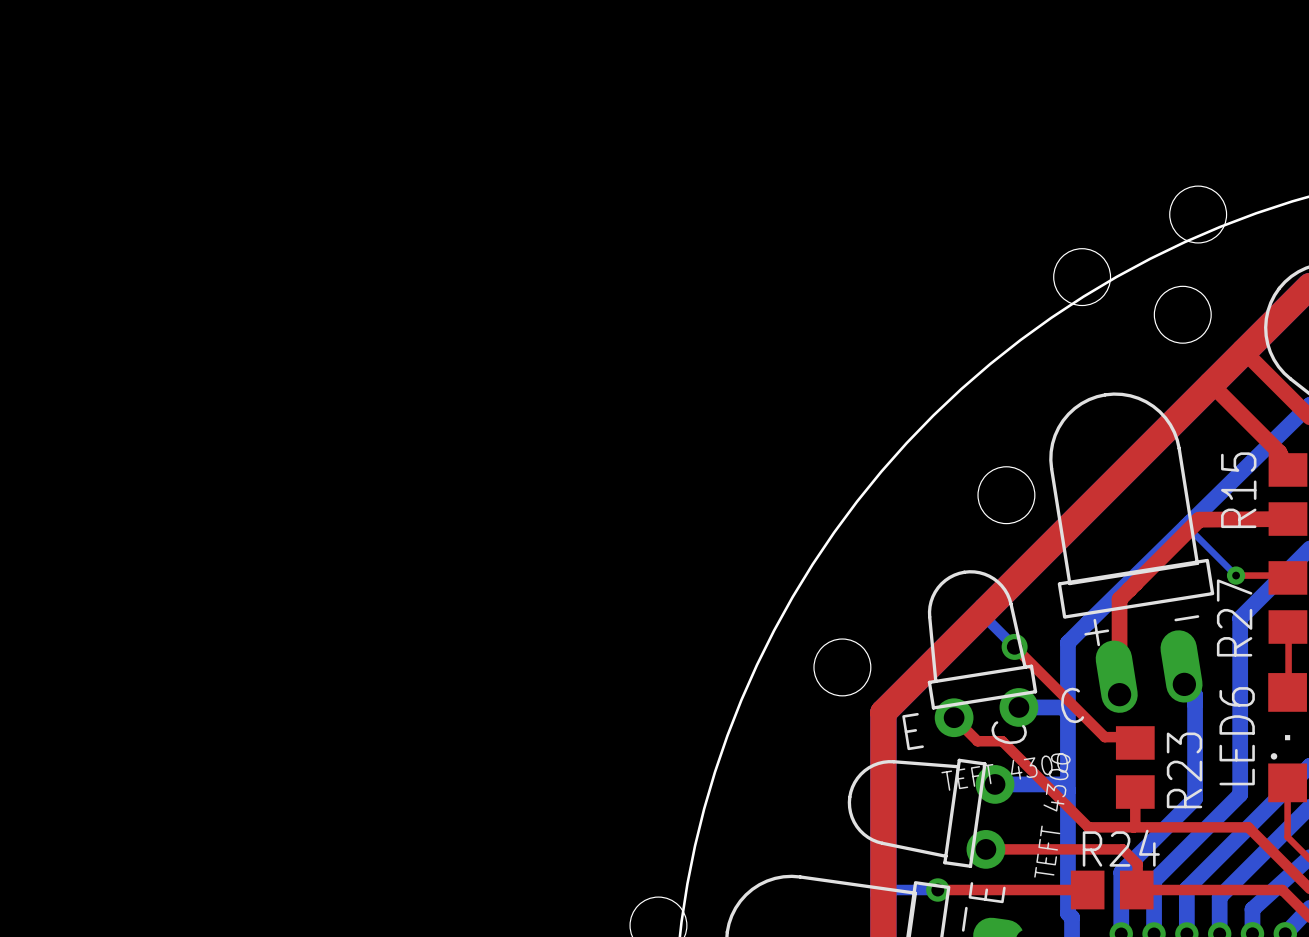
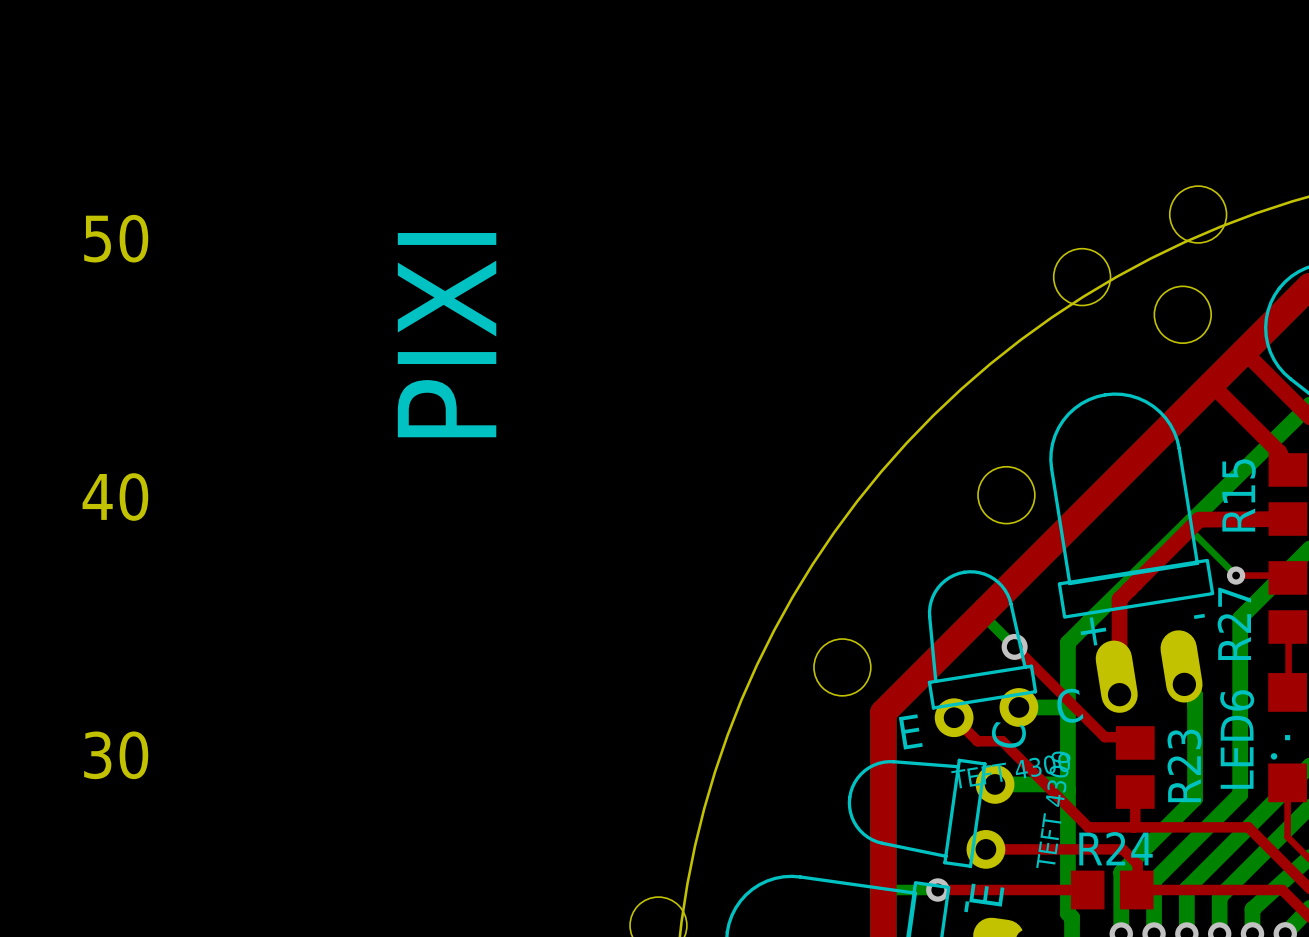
text: none -> 50 (116, 238)
text: none -> PIXI (447, 335)
text: none -> 40 (115, 496)
text: none -> 30 (116, 755)

